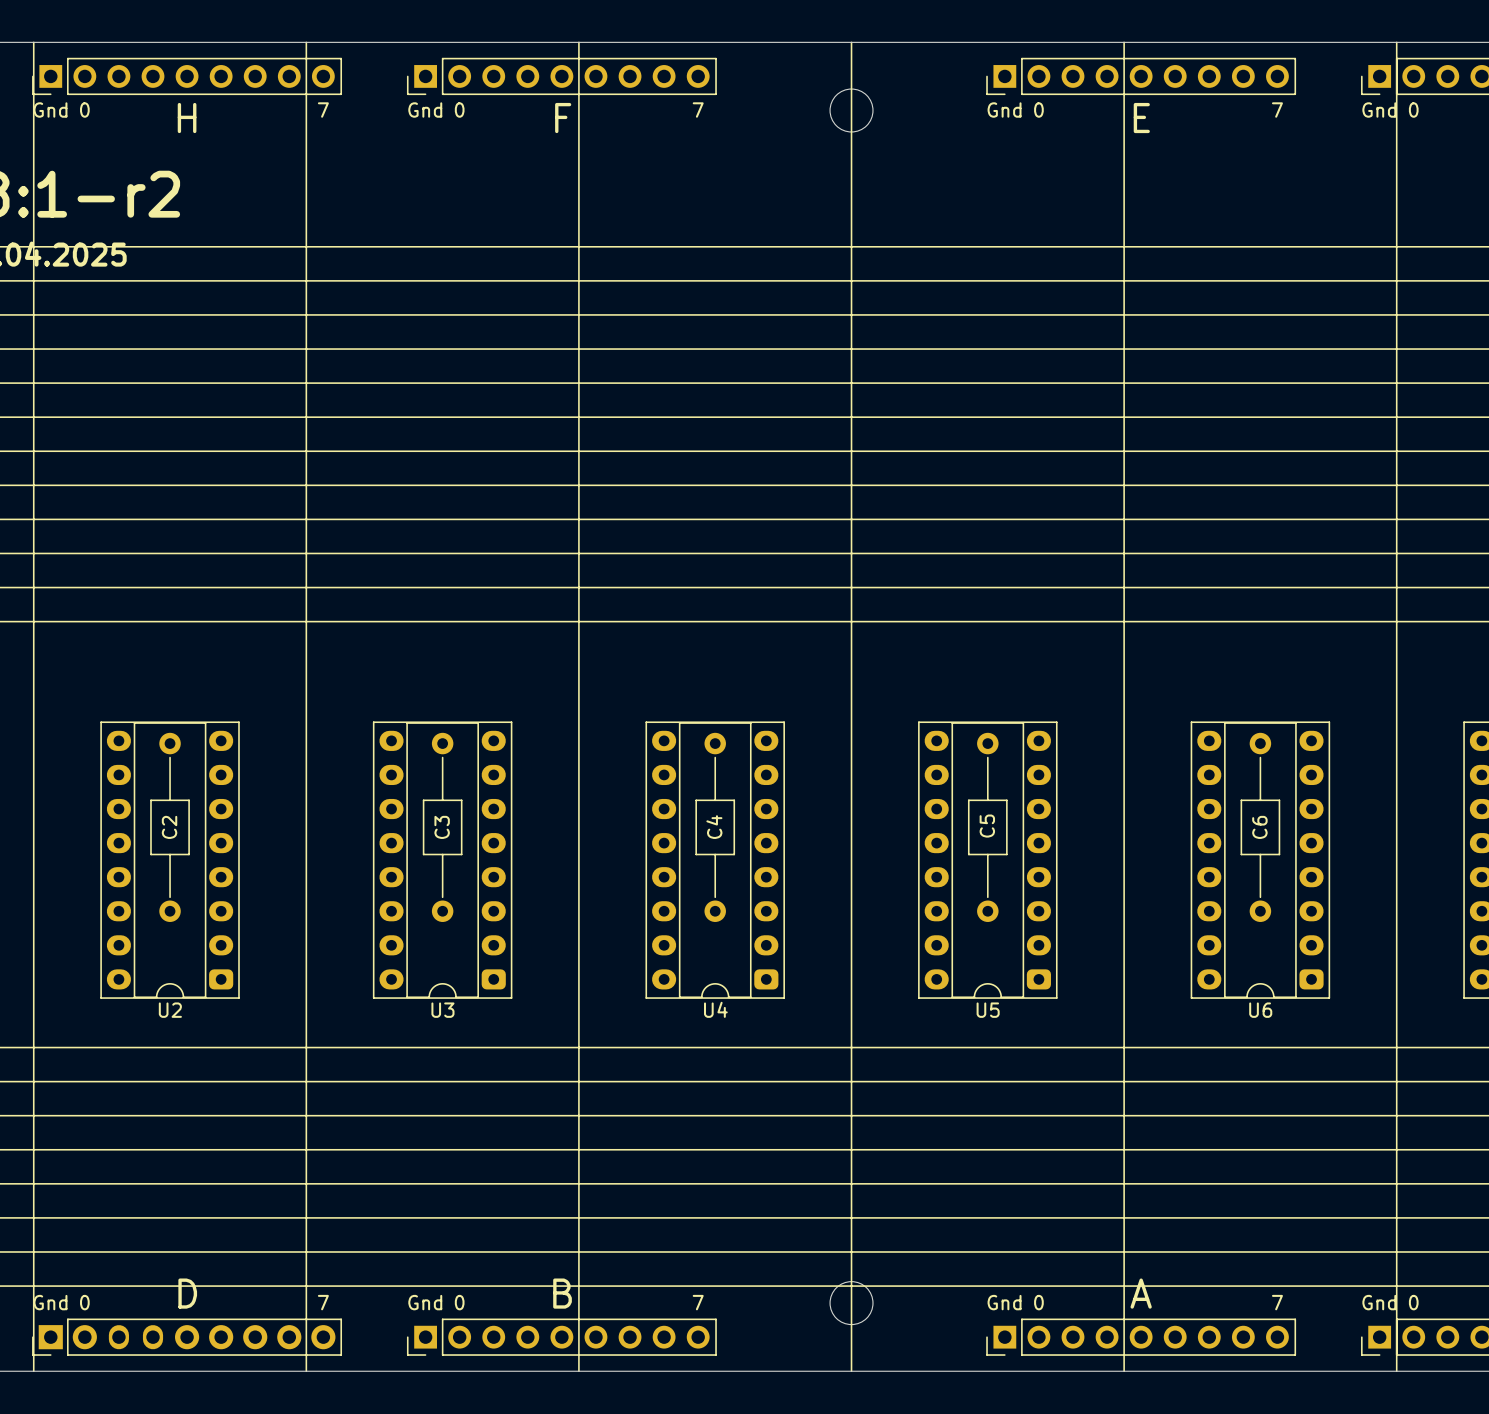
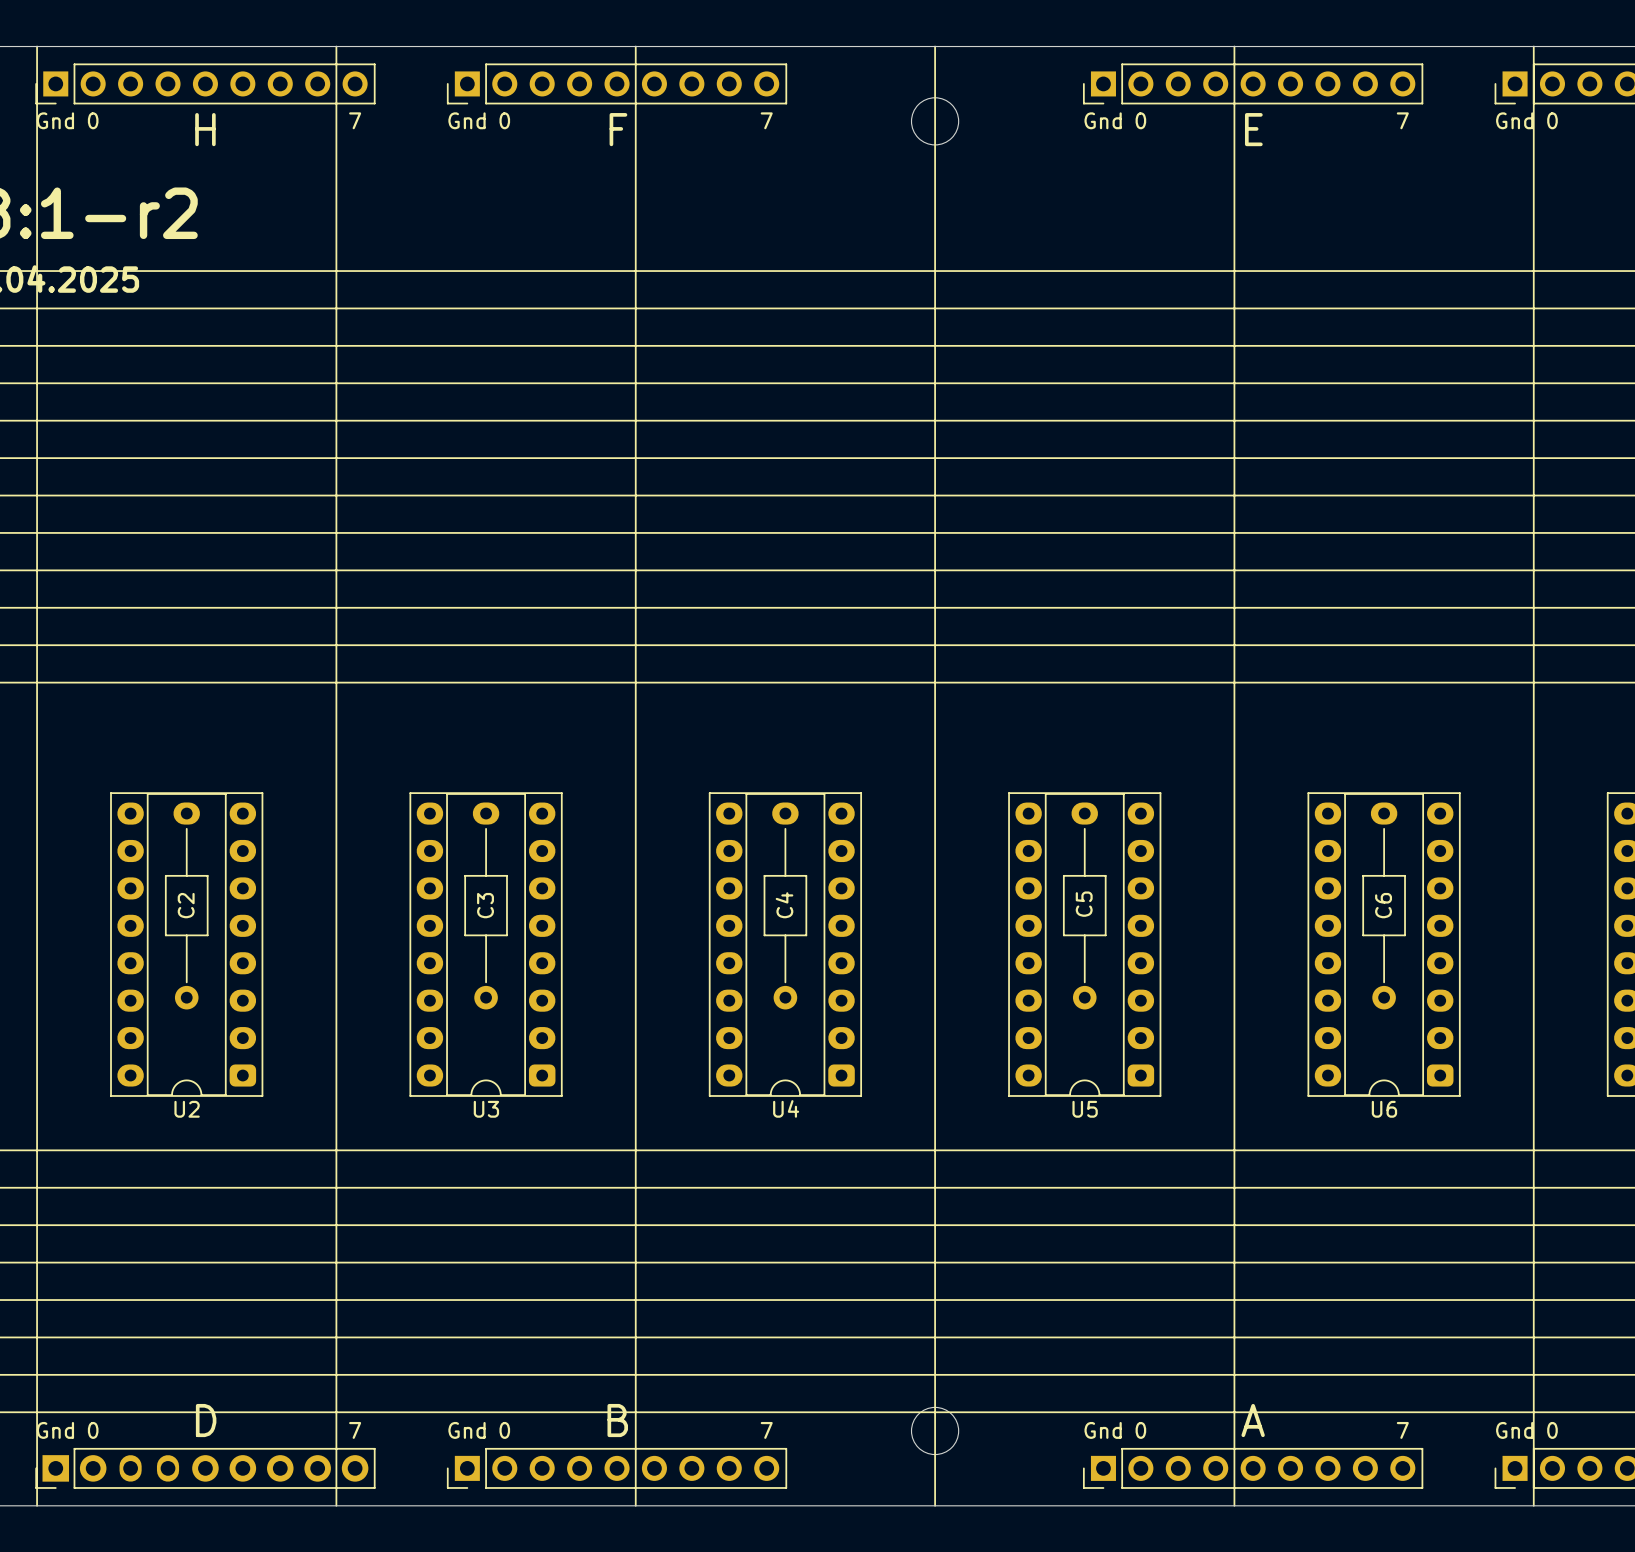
C2 footprint: [150, 732, 190, 922] -> [164, 802, 209, 1010]
C3 footprint: [422, 732, 463, 922] -> [464, 802, 508, 1010]
C4 footprint: [695, 732, 736, 922] -> [763, 802, 808, 1010]
C5 footprint: [967, 732, 1008, 922] -> [1062, 802, 1107, 1010]
C6 footprint: [1240, 732, 1281, 922] -> [1362, 802, 1406, 1010]

